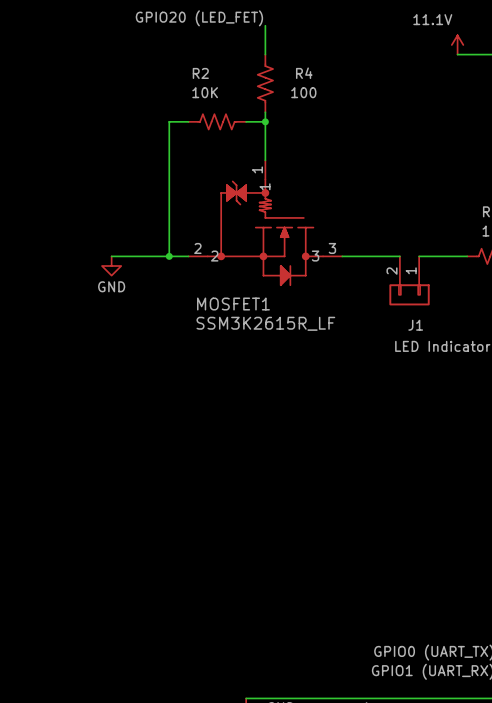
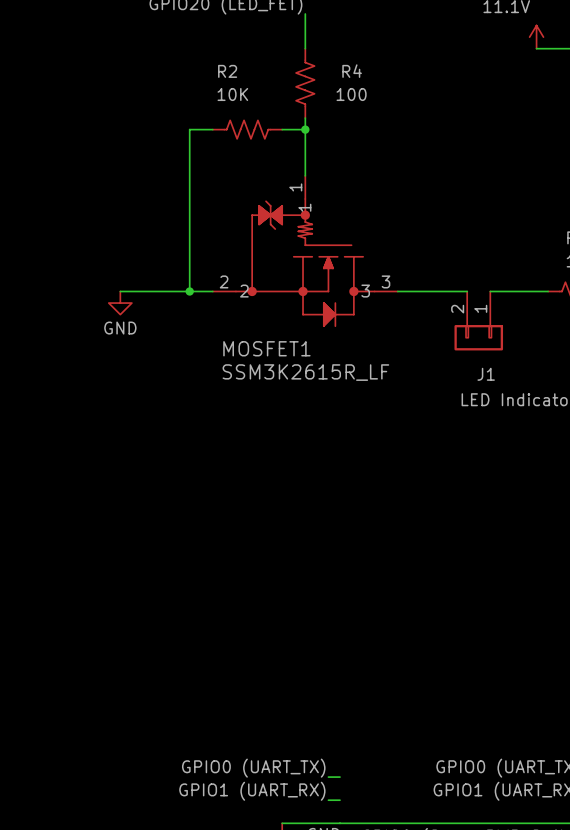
label: none -> GPIO0 (UART_TX) (253, 768)
wire: none -> (328, 777) (340, 777)
label: none -> GPIO1 (UART_RX) (252, 791)
wire: none -> (328, 800) (340, 800)

